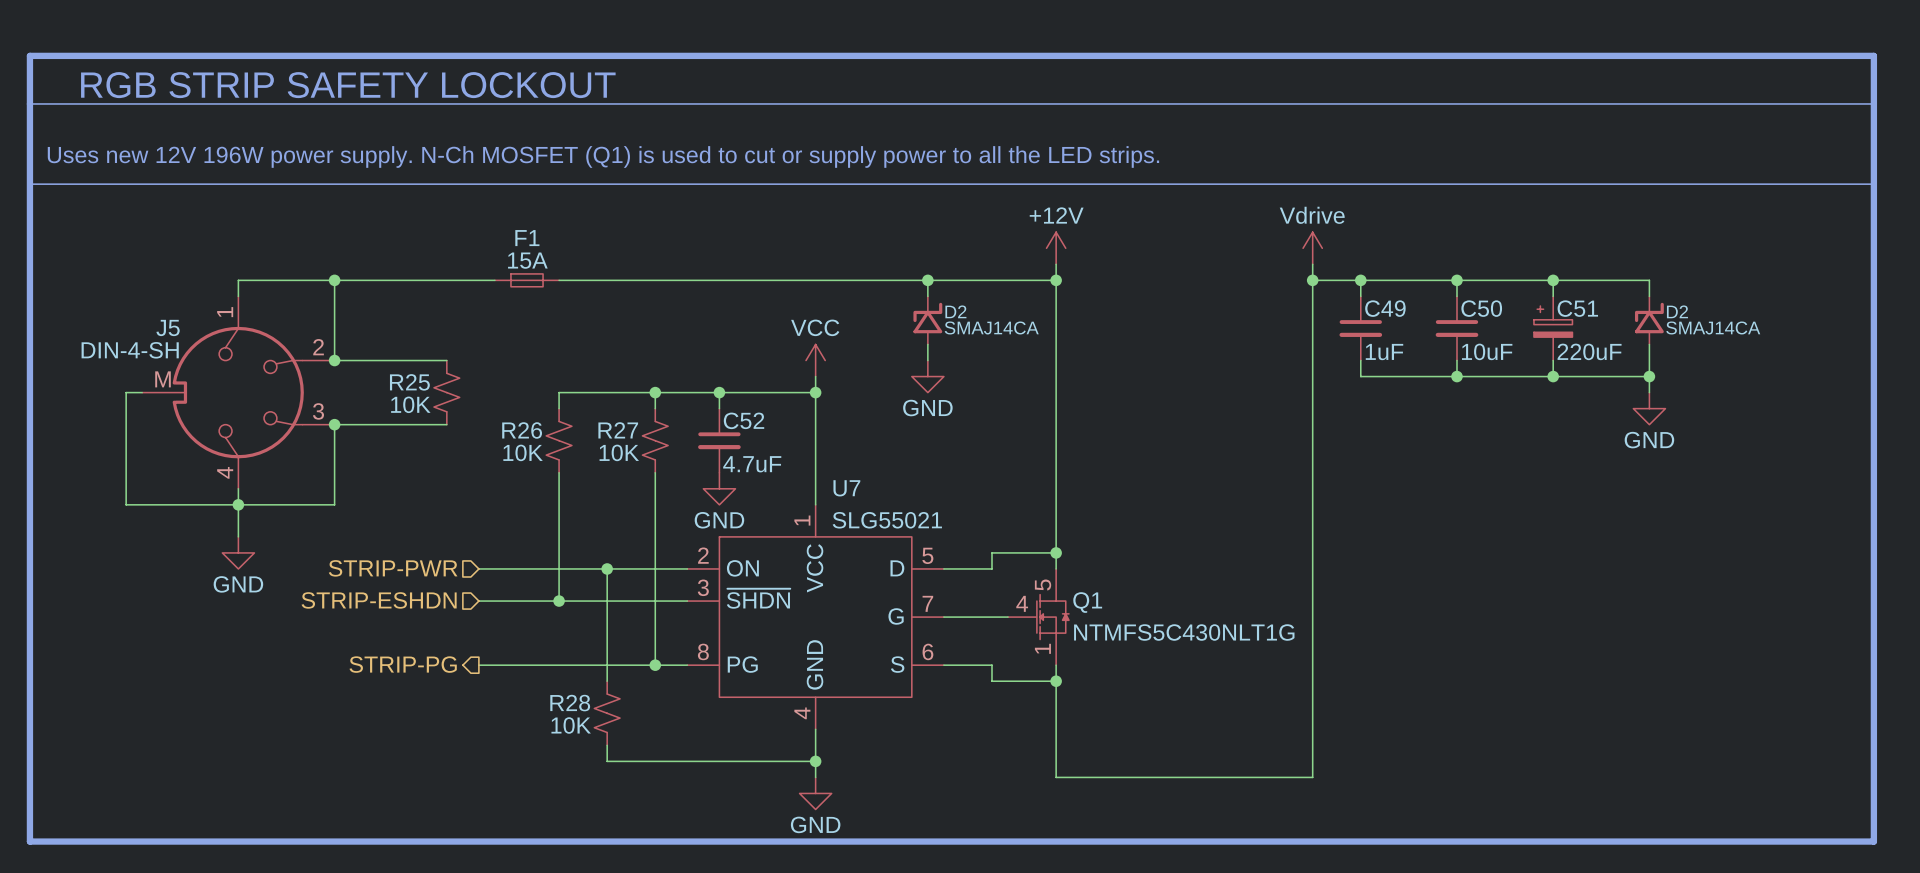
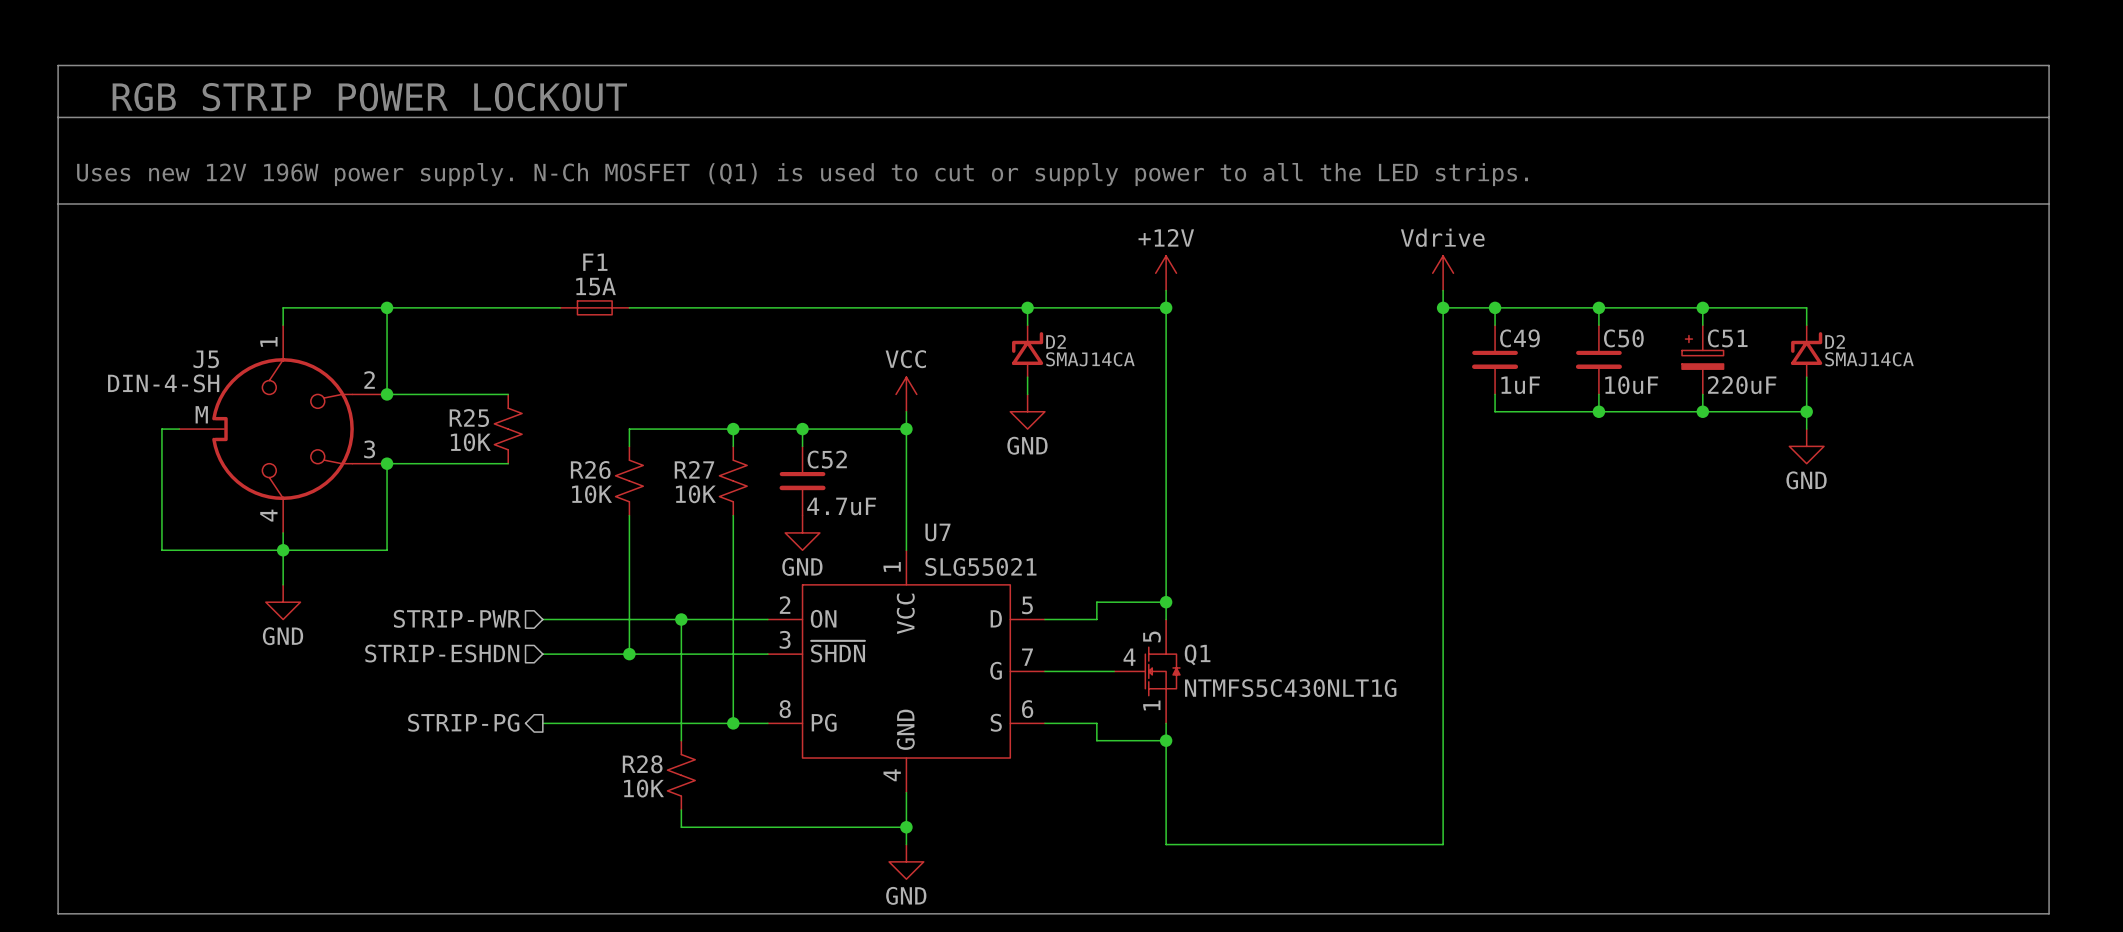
line width: thick (29, 55) (29, 841) (1873, 841) (1873, 55) (29, 55) -> thin (58, 65) (58, 913) (2049, 913) (2049, 65) (58, 65)
text: RGB STRIP SAFETY LOCKOUT (348, 85) -> RGB STRIP POWER LOCKOUT (369, 97)

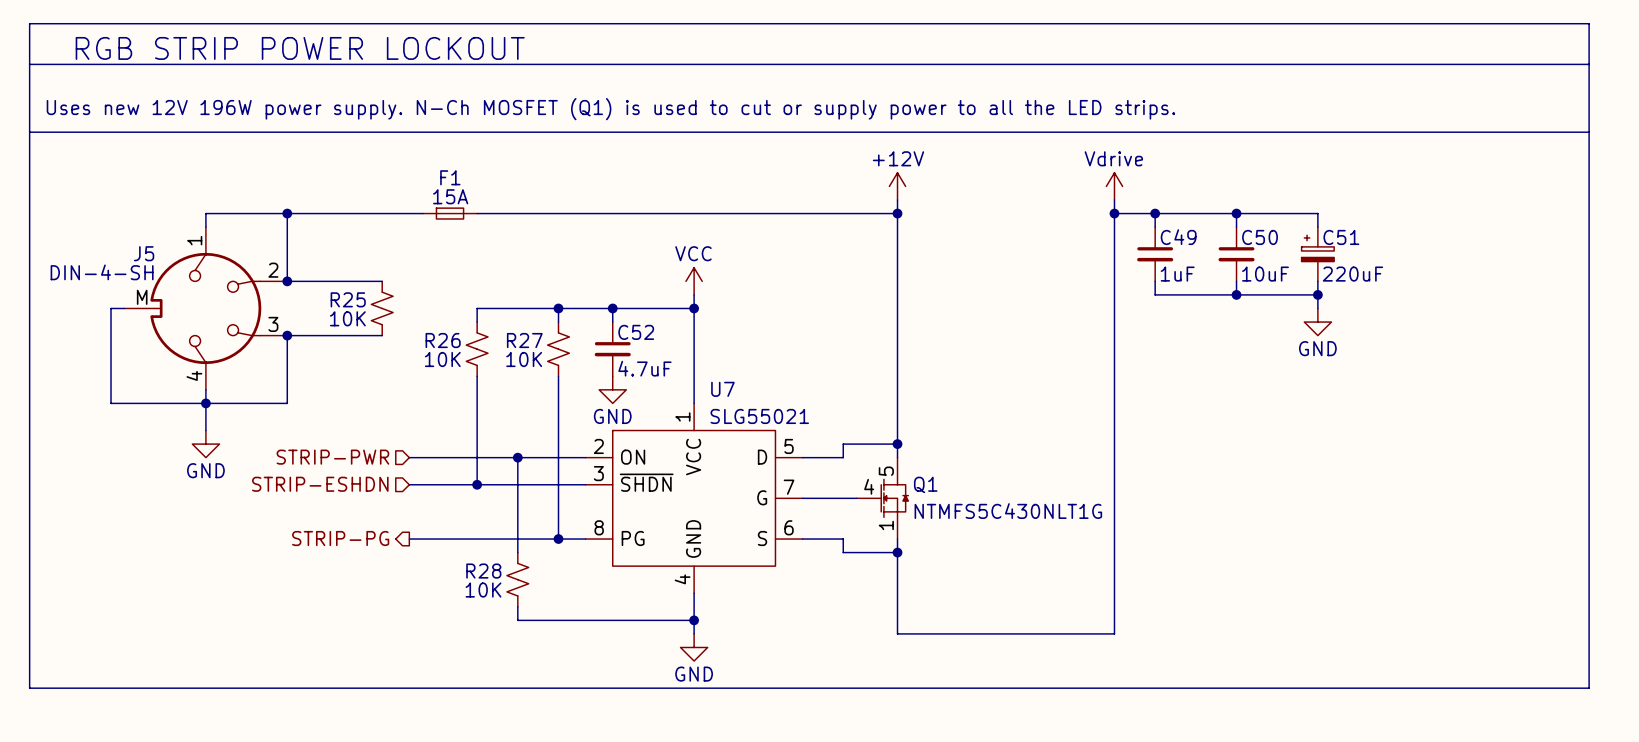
wire: (1027, 307) (1027, 325) -> none
junction: (1027, 307) -> none
wire: (1702, 307) (1806, 307) (1806, 325) -> none
junction: (1702, 307) -> none
D2: SMAJ14CA (1027, 351) -> none
D2: SMAJ14CA (1806, 351) -> none
wire: (1027, 377) (1027, 394) -> none
wire: (1806, 377) (1806, 429) -> none
power symbol: GND (1027, 411) -> none
wire: (1702, 411) (1806, 411) -> (1317, 294) (1317, 308)
junction: (1806, 411) -> none
power symbol position: GND (1806, 446) -> GND (1317, 322)

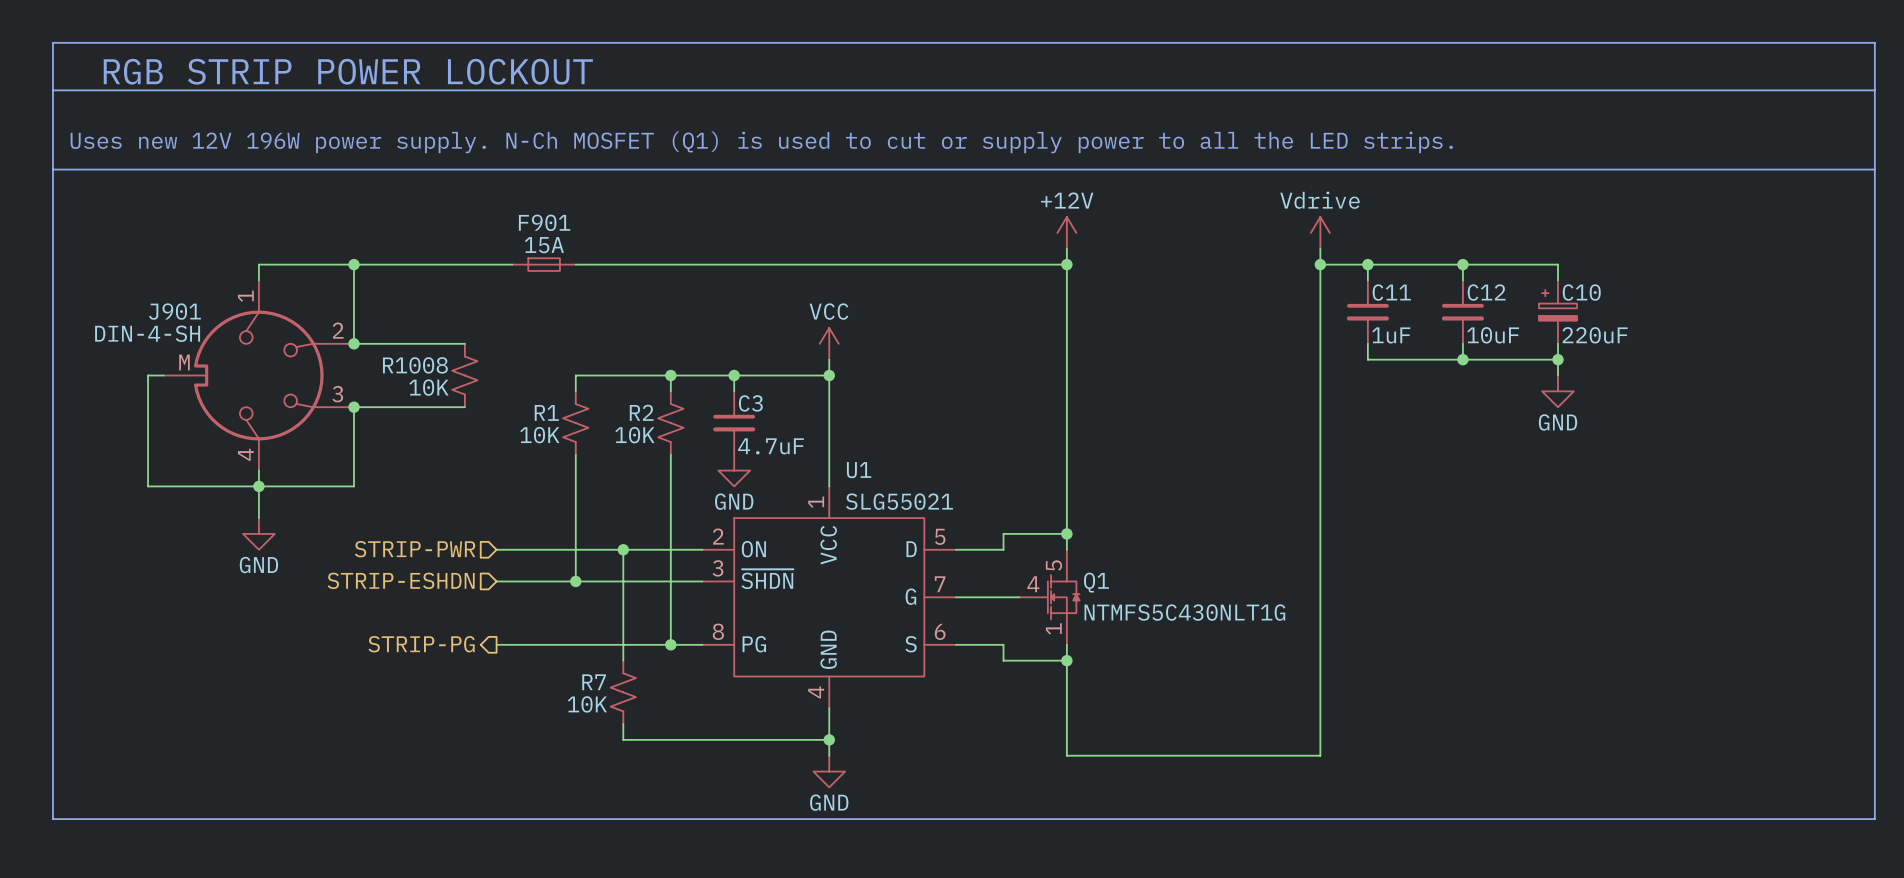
F1 name: F1 (450, 177) -> F901 (544, 222)
C49 name: C49 (1178, 237) -> C11 (1391, 292)
C50 name: C50 (1260, 237) -> C12 (1486, 292)
C51 name: C51 (1341, 237) -> C10 (1581, 292)
J5 name: J5 (144, 253) -> J901 (174, 311)
R25 name: R25 (348, 299) -> R1008 (415, 365)
C52 name: C52 (636, 332) -> C3 (750, 403)
R26 name: R26 (443, 340) -> R1 (546, 412)
R27 name: R27 (524, 340) -> R2 (641, 412)
U7 name: U7 (722, 389) -> U1 (859, 470)
R28 name: R28 (483, 571) -> R7 (594, 682)

